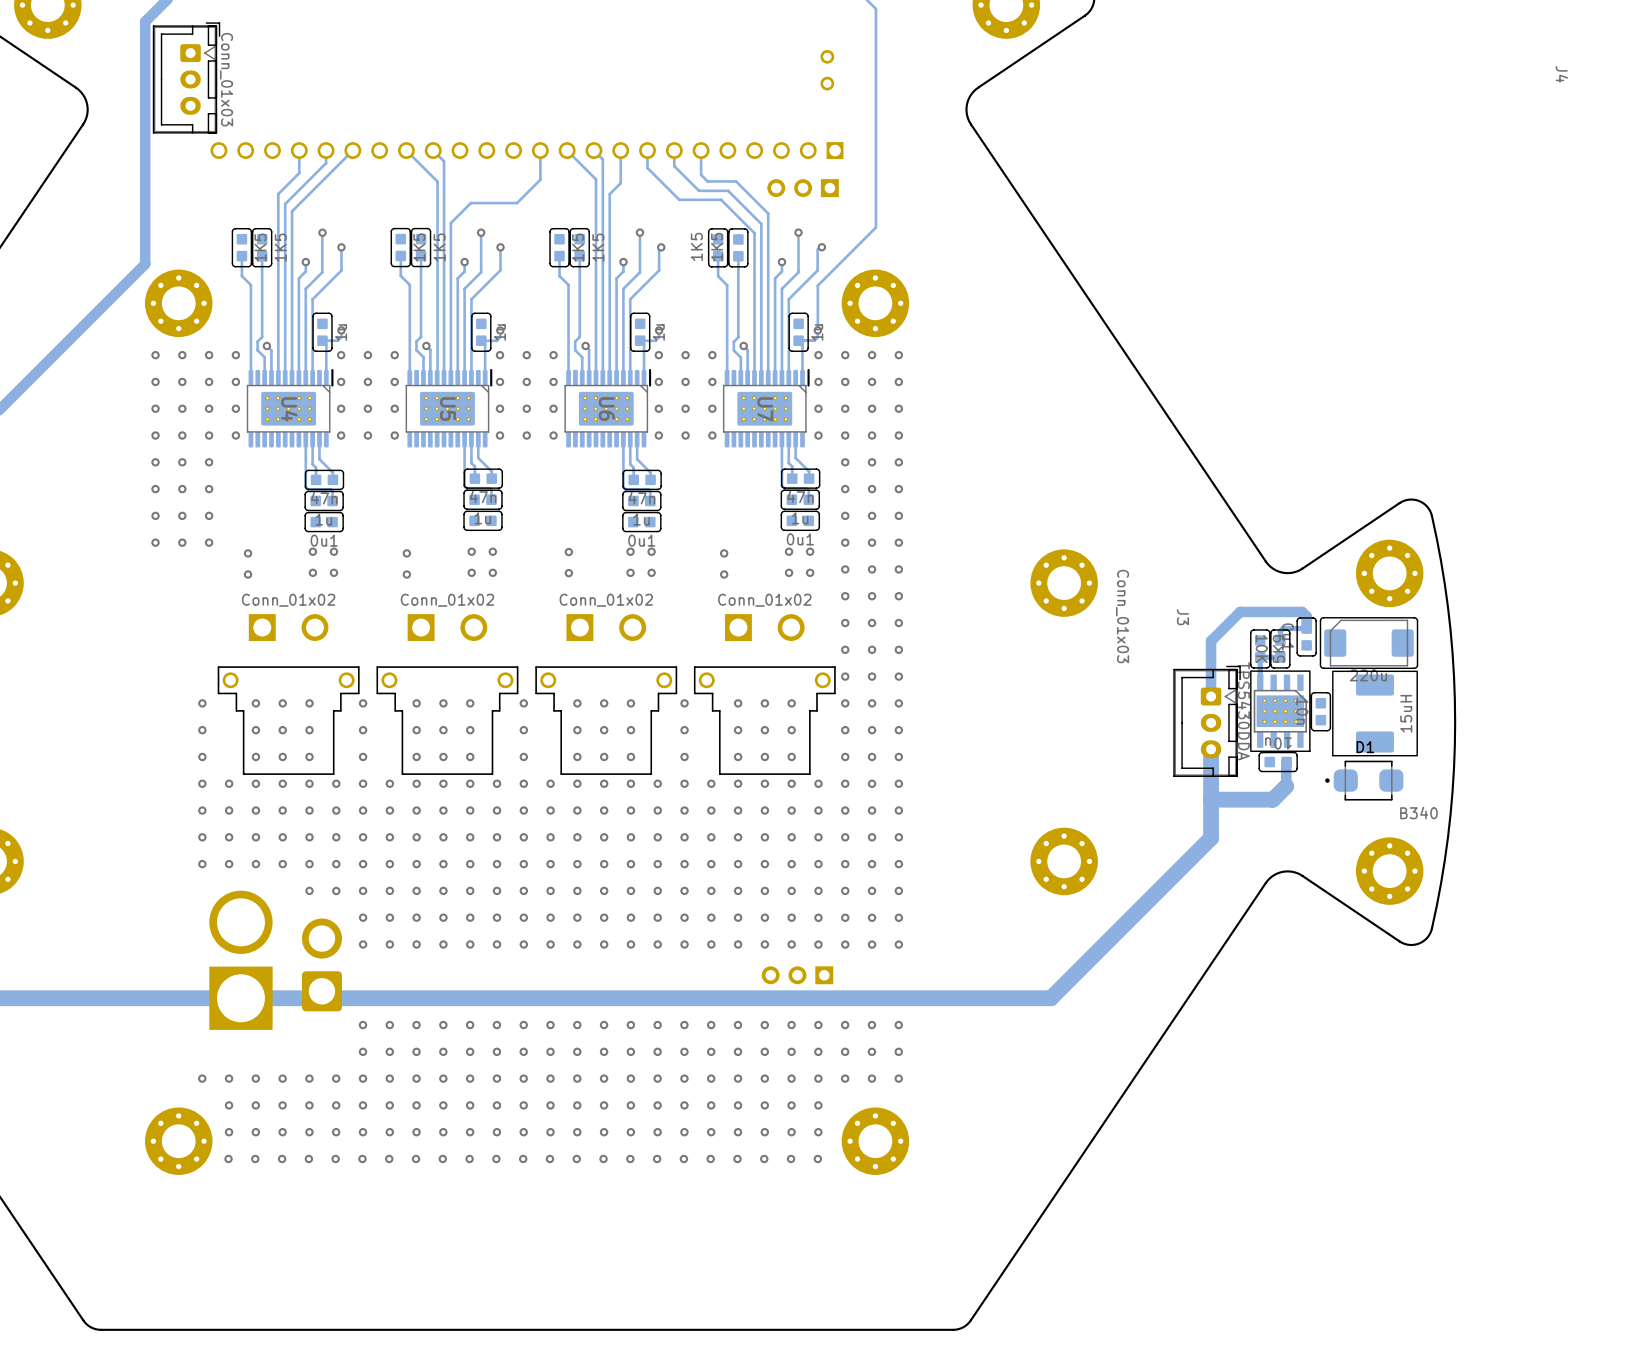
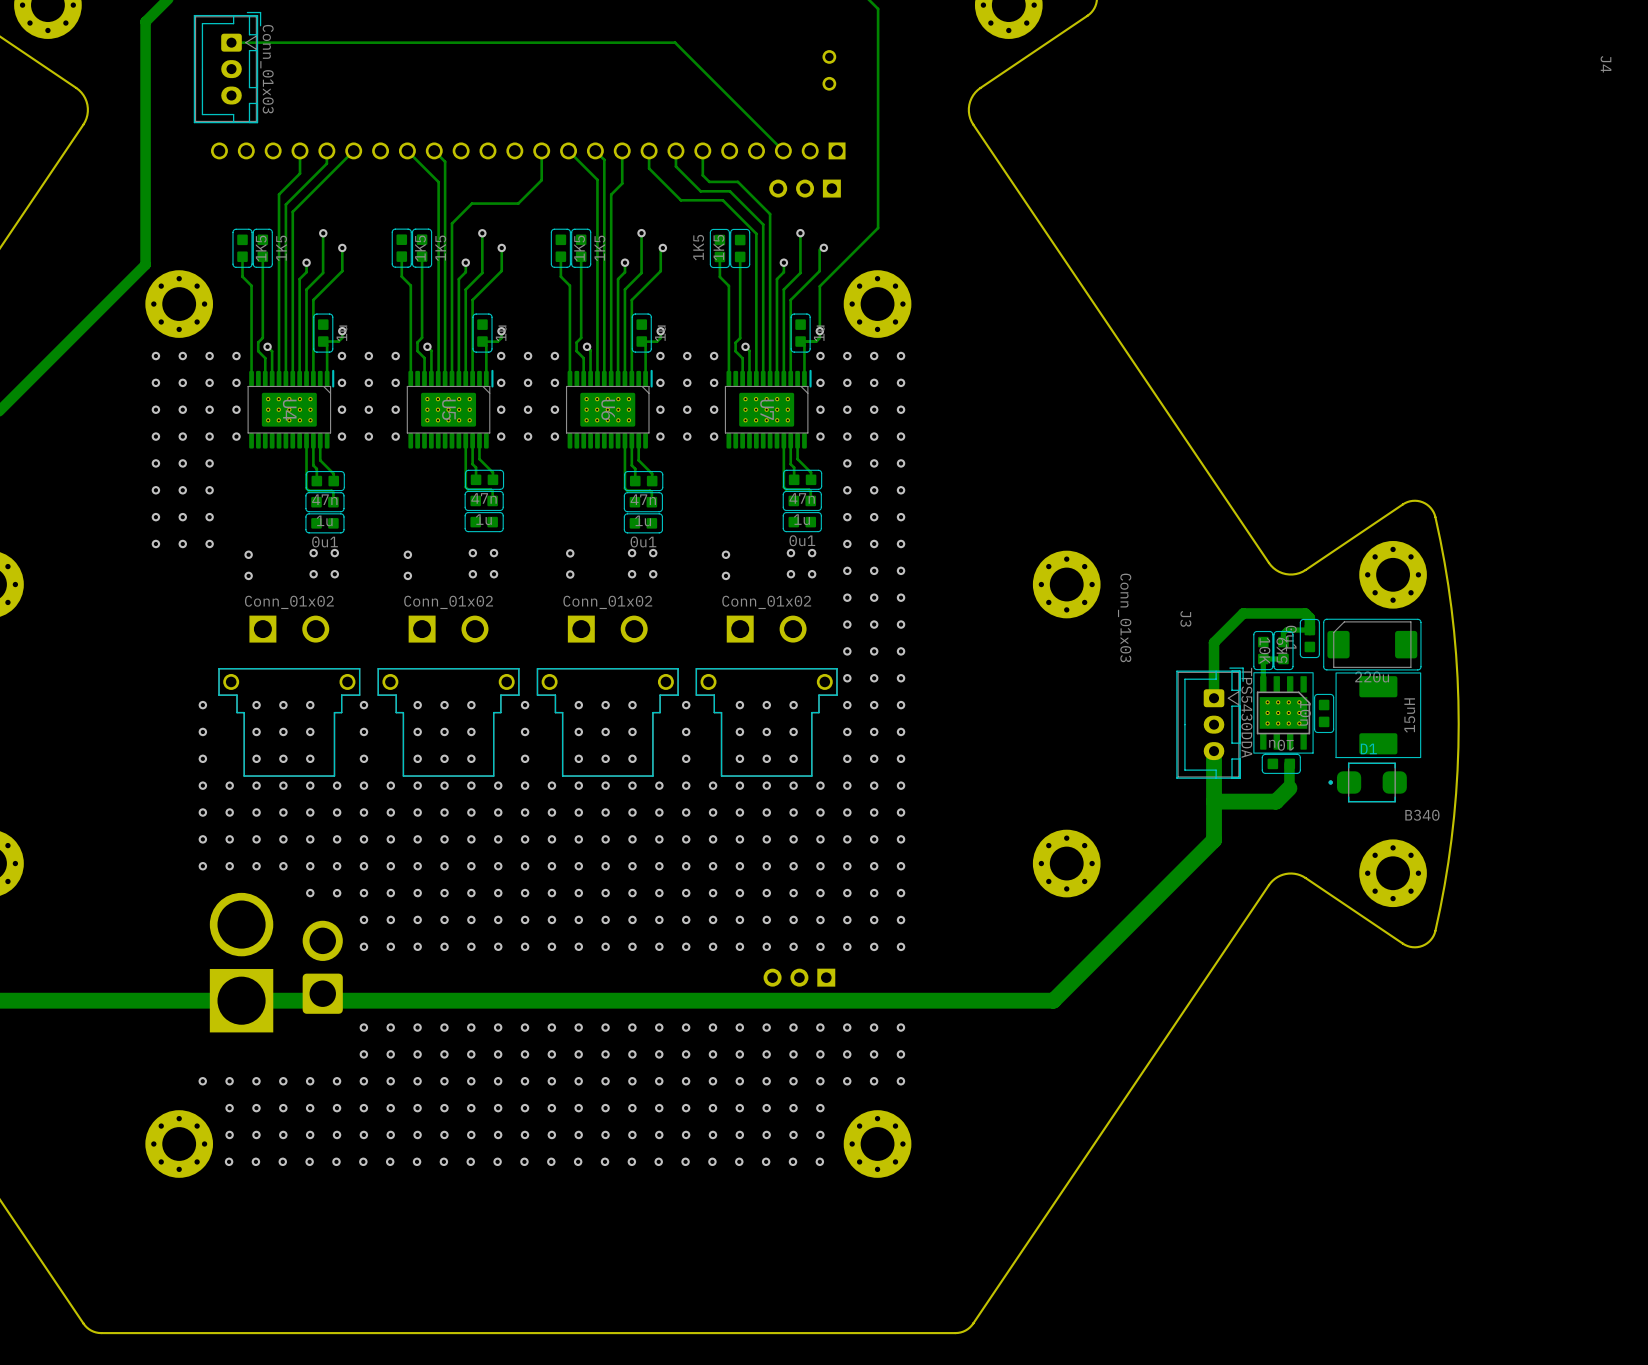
track: none -> (231, 42) (675, 42) (783, 150)
J4 position: (186, 77) -> (227, 67)

